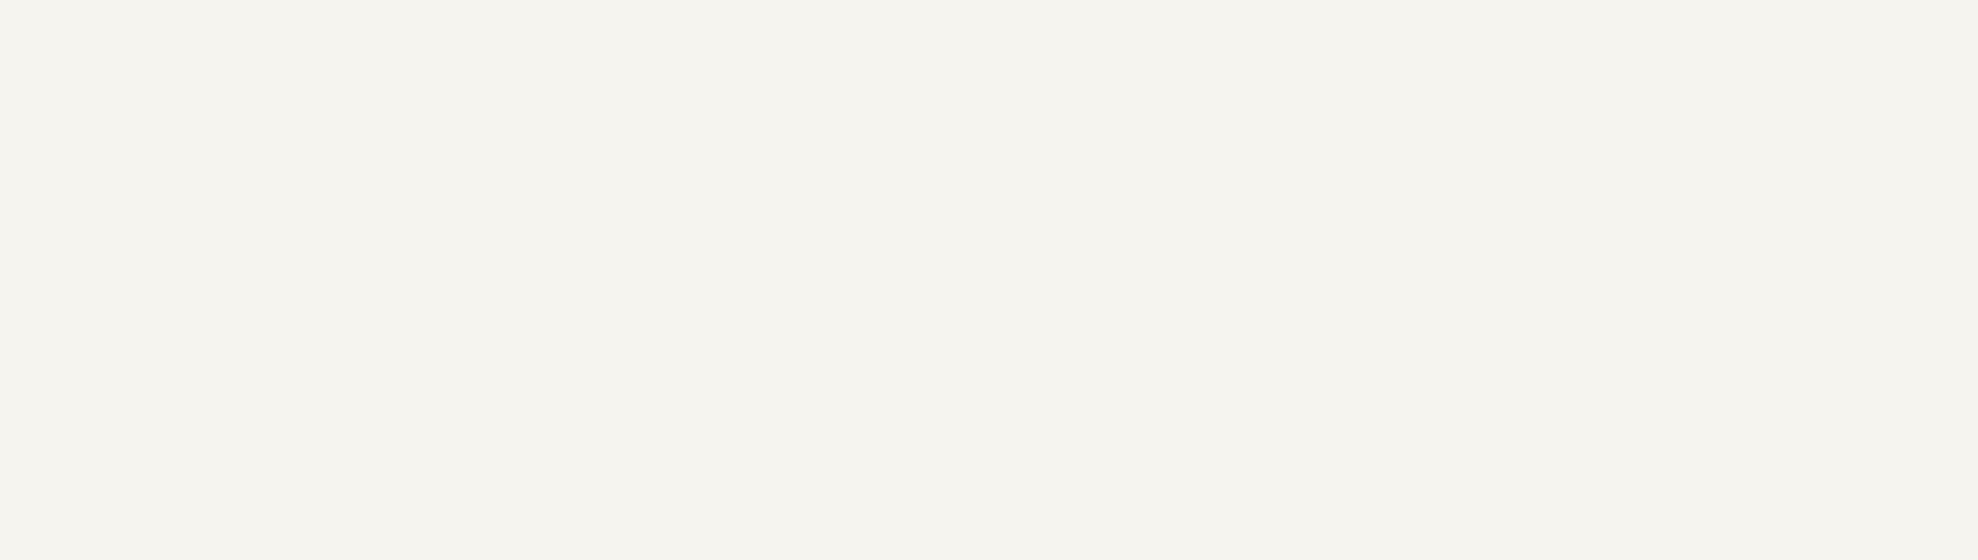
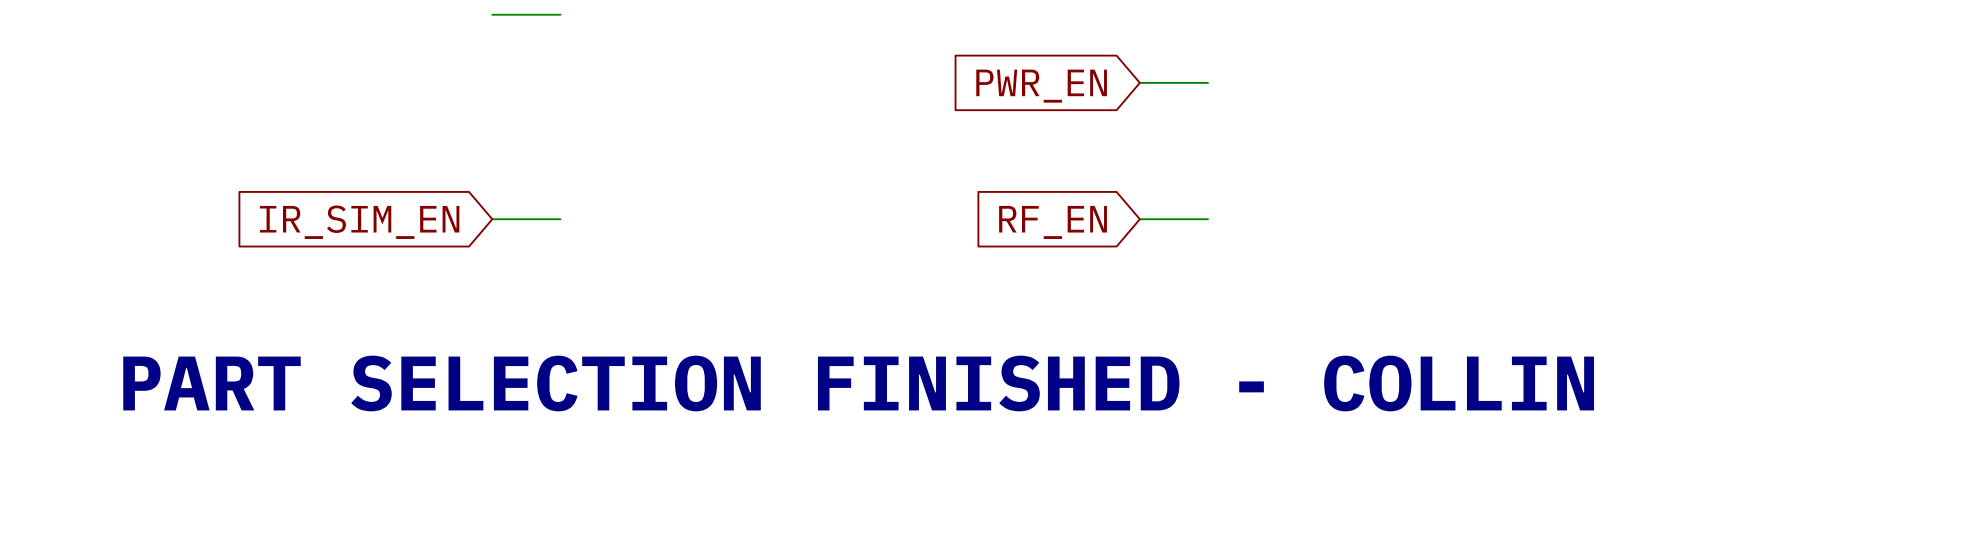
wire: none -> (492, 14) (560, 14)
wire: none -> (1139, 82) (1208, 82)
global label: none -> PWR_EN (1041, 86)
wire: none -> (492, 219) (560, 219)
wire: none -> (1139, 219) (1208, 219)
global label: none -> IR_SIM_EN (359, 222)
global label: none -> RF_EN (1053, 222)
text: none -> PART SELECTION FINISHED - COLLIN (858, 383)

